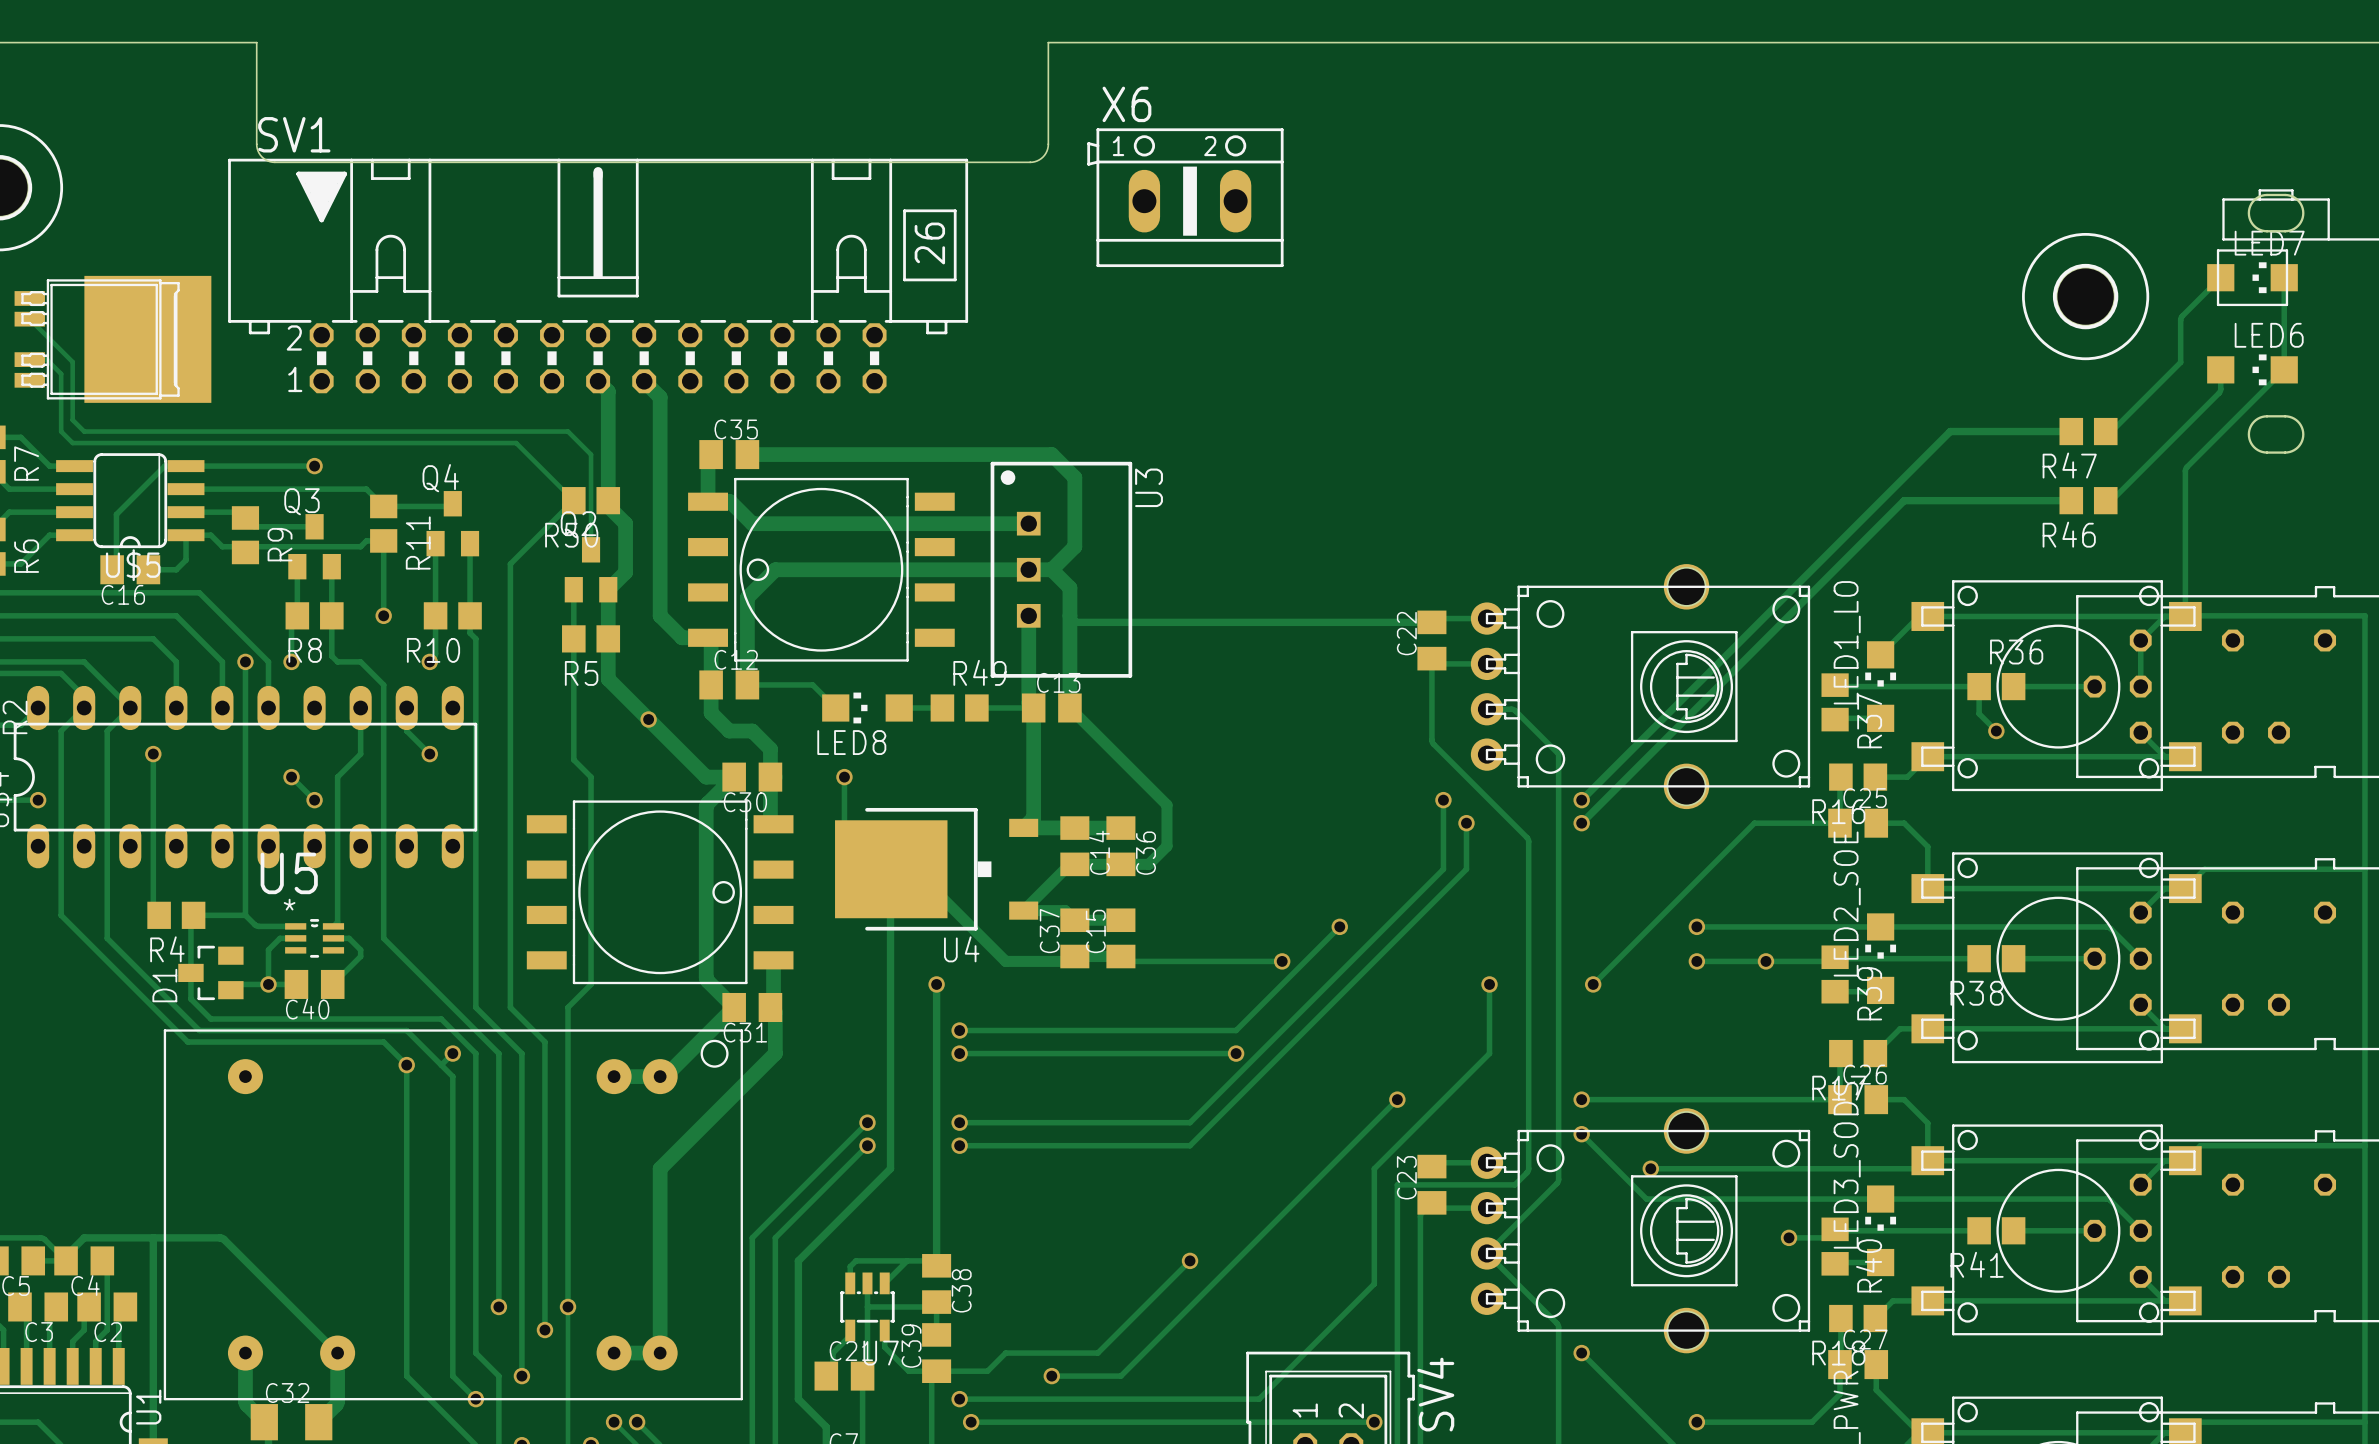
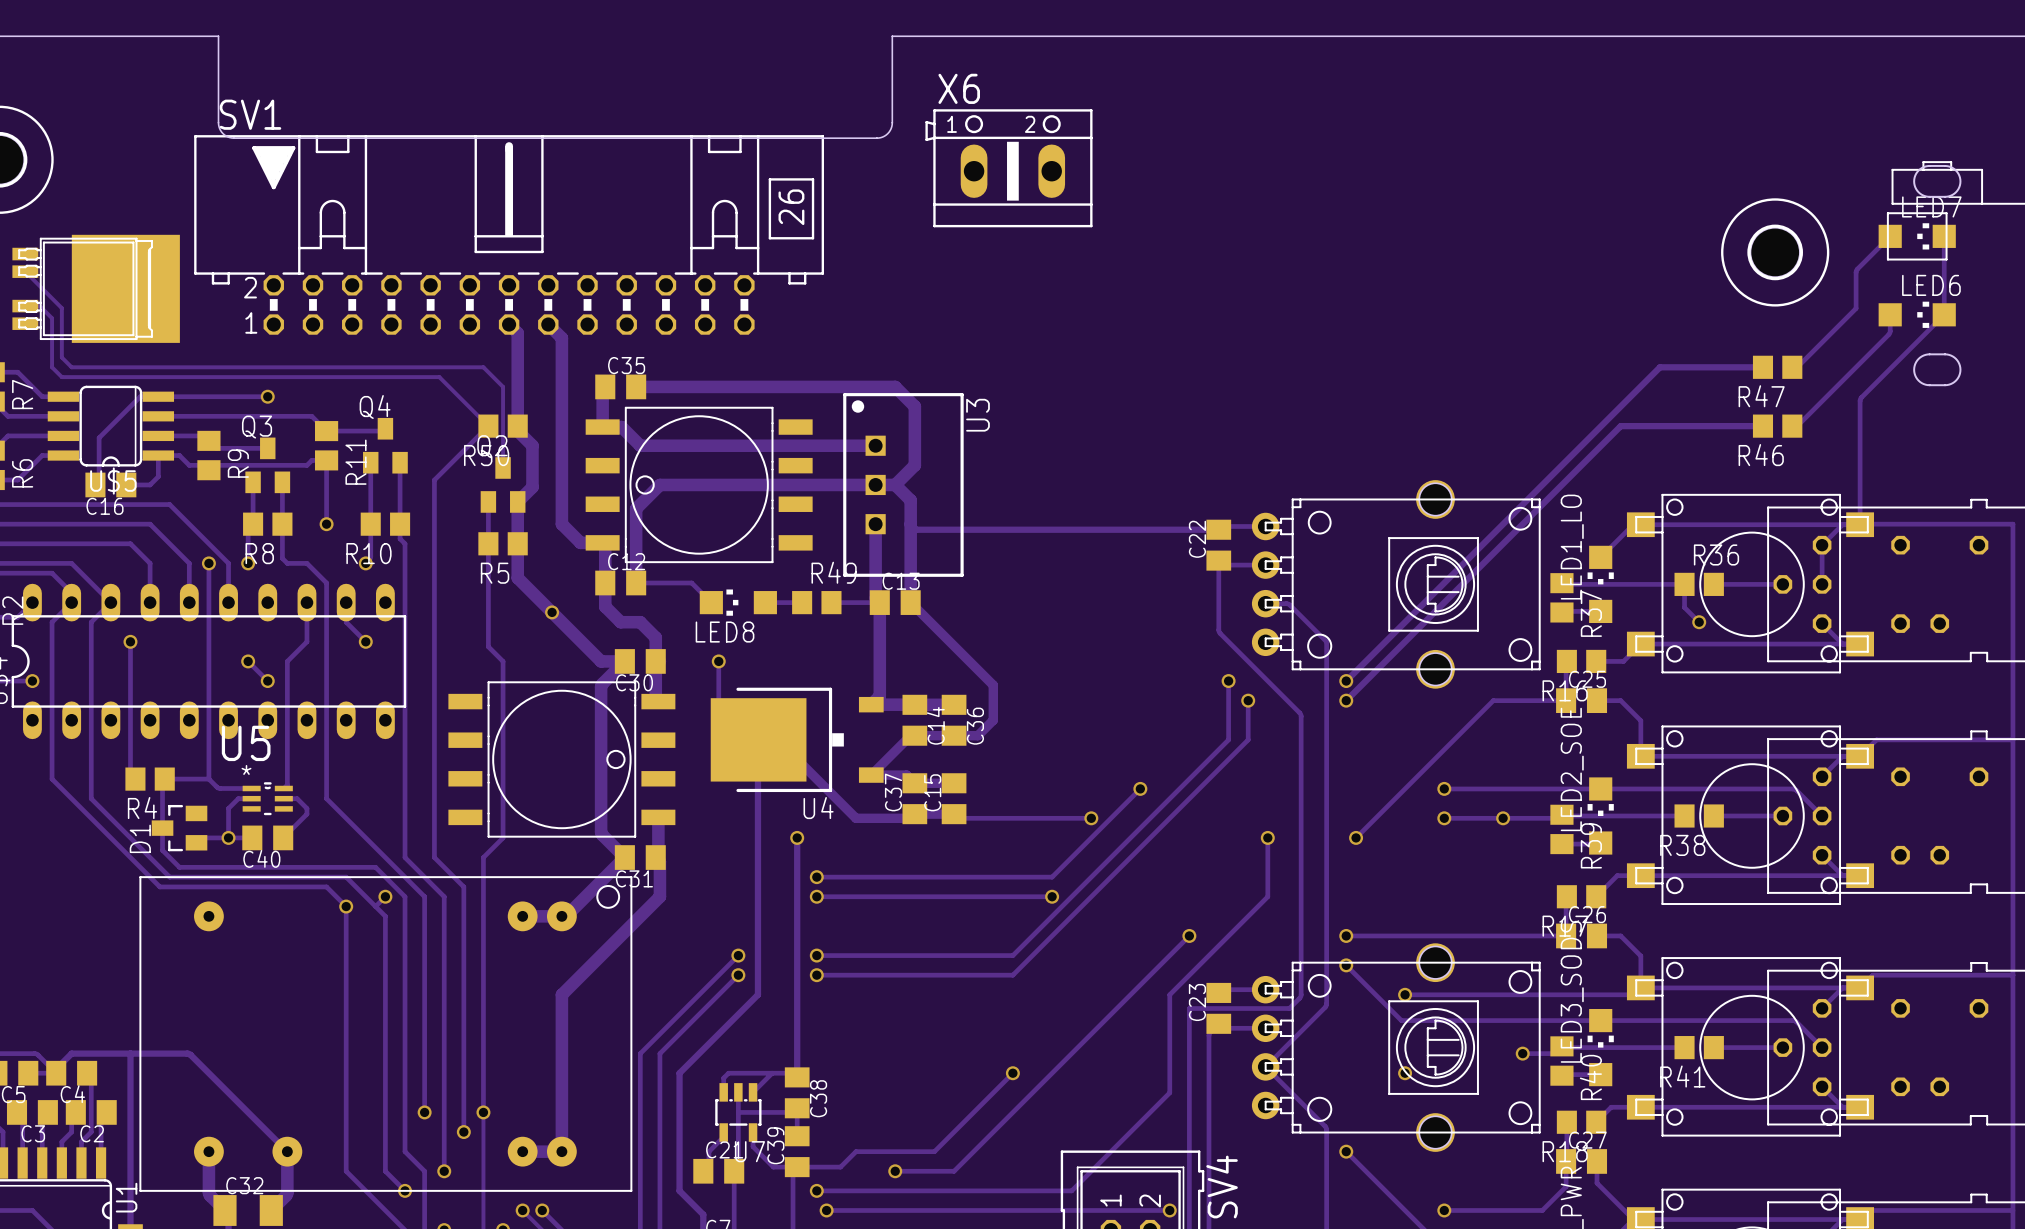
via: none -> (1405, 1073)

